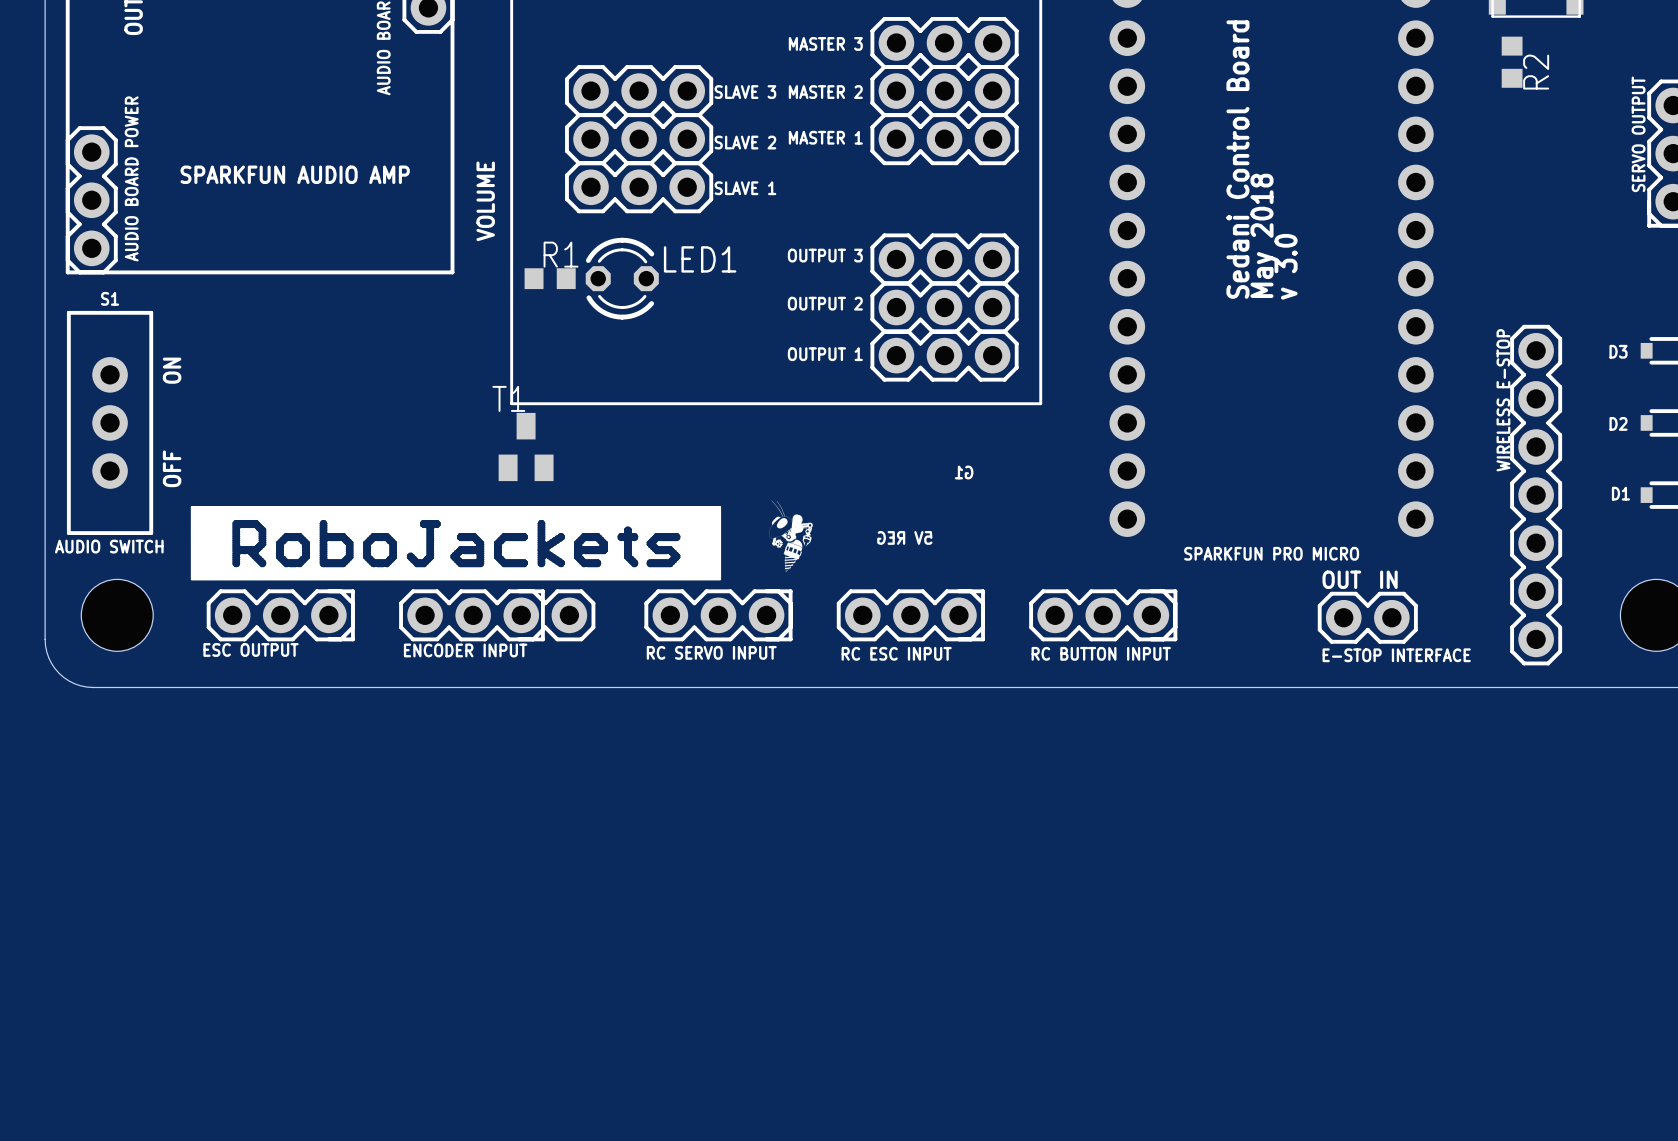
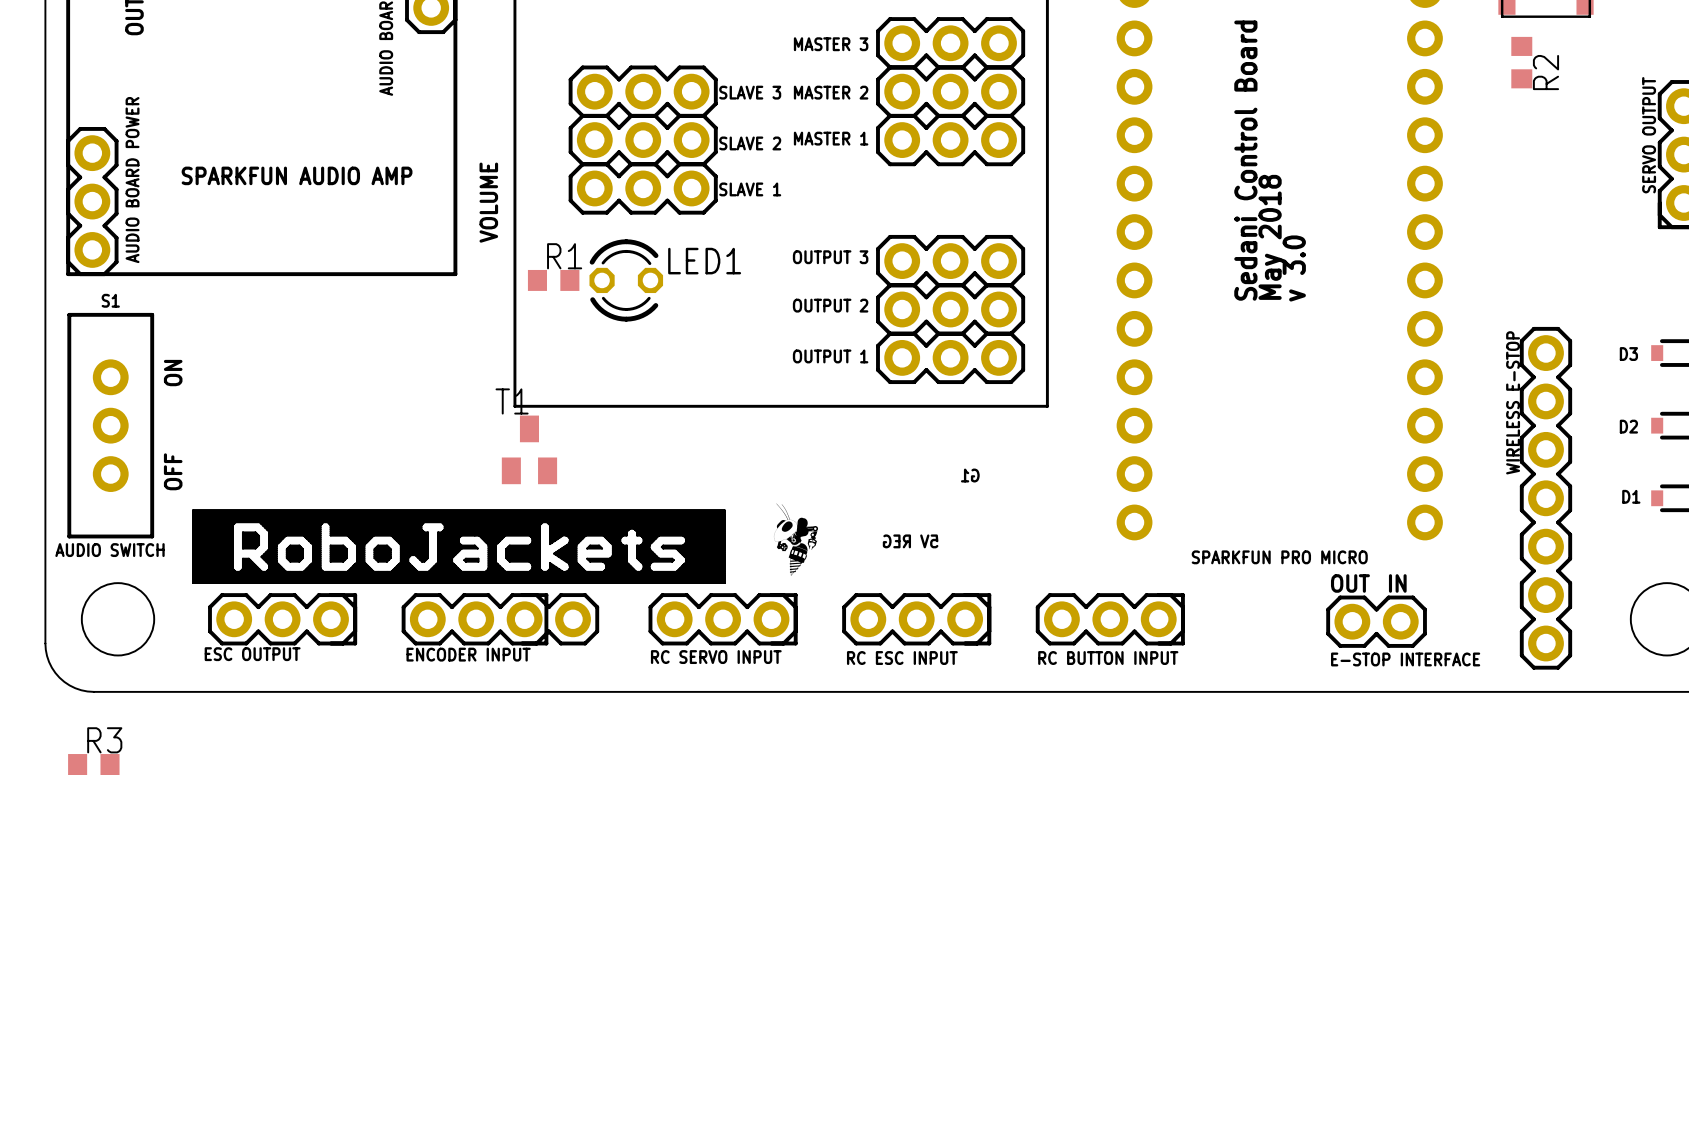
R3: none -> (93, 764)

